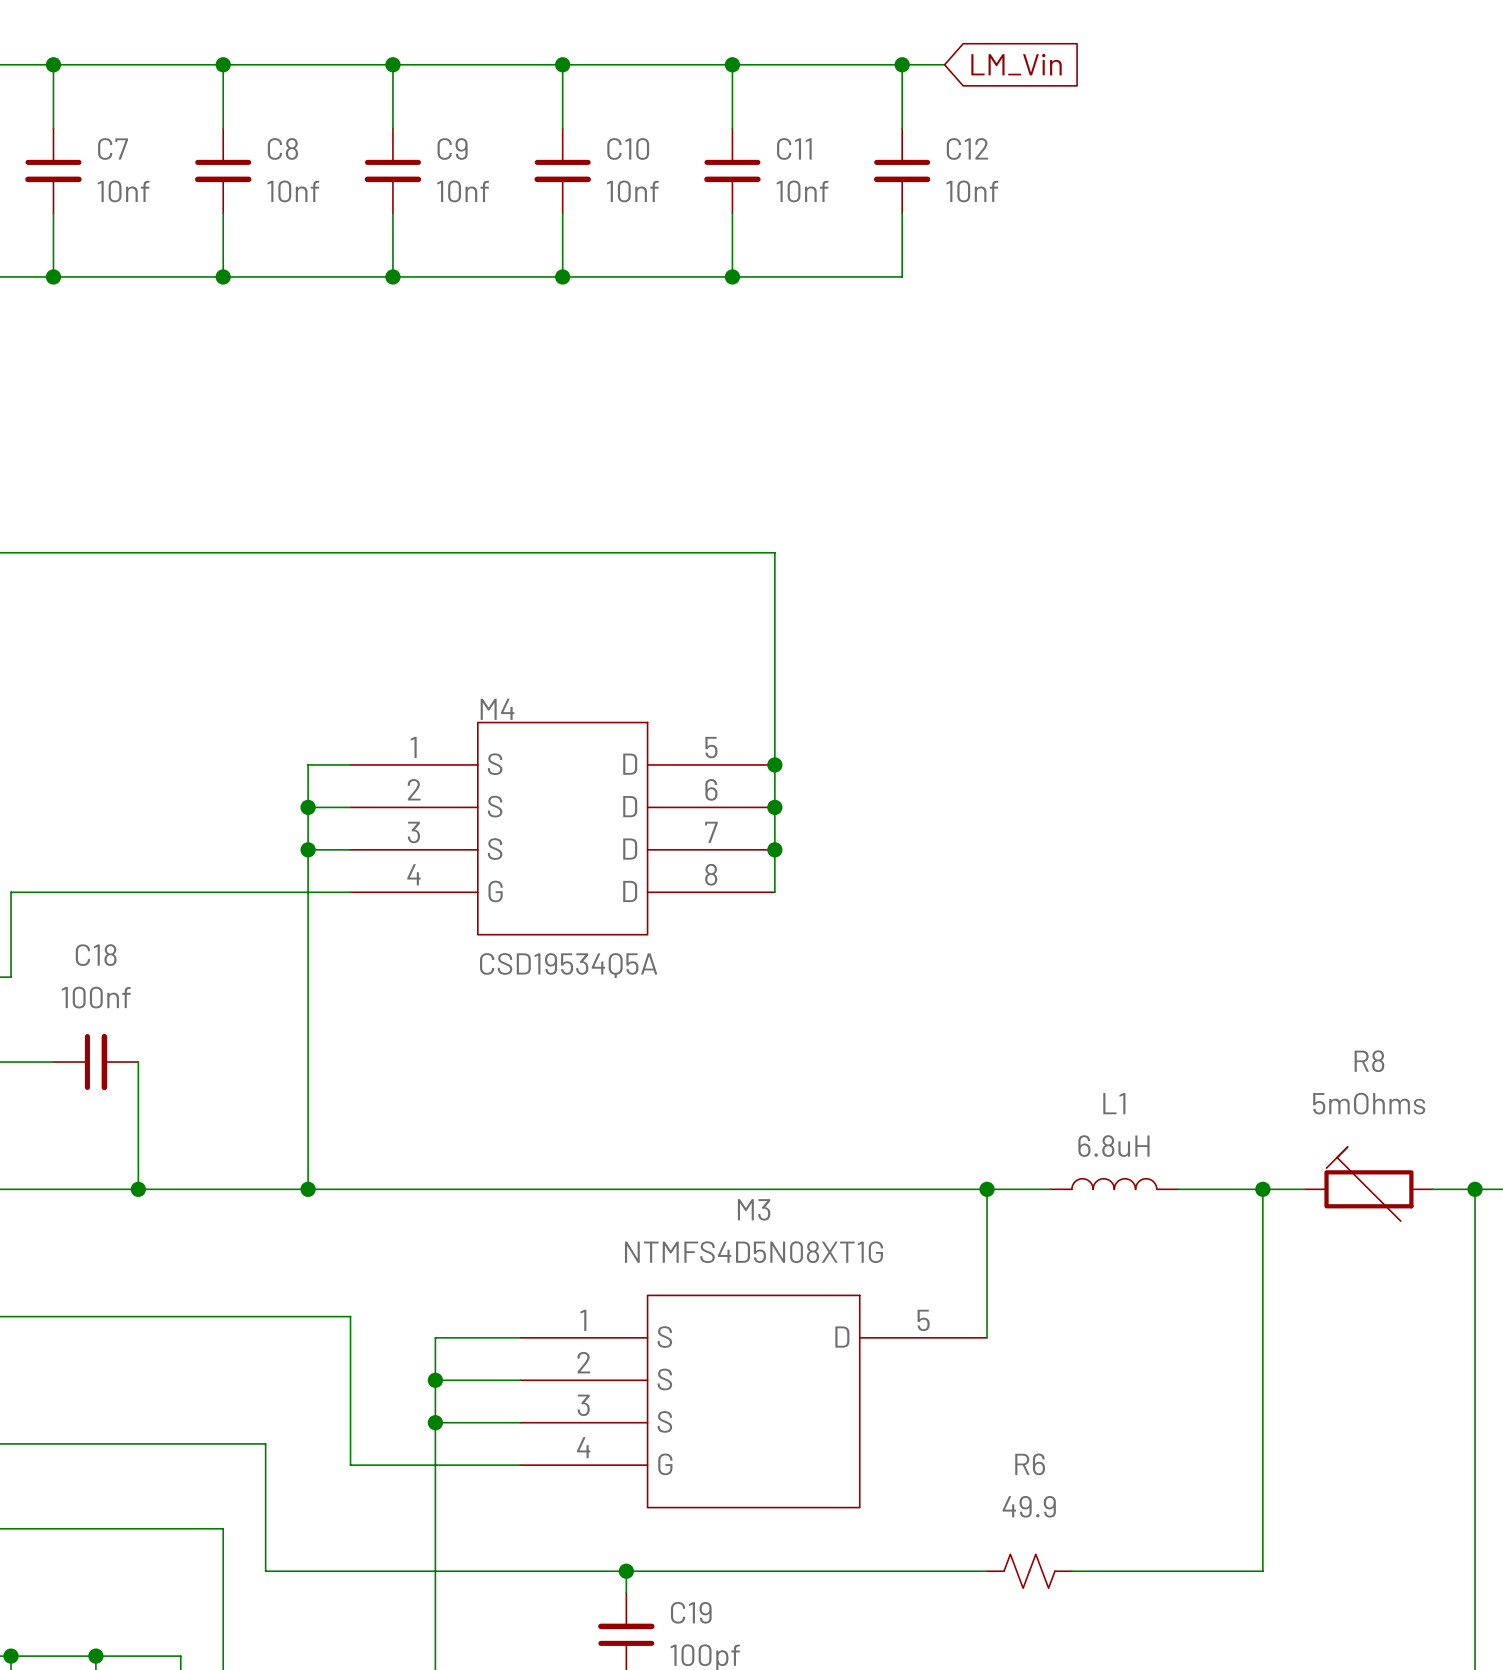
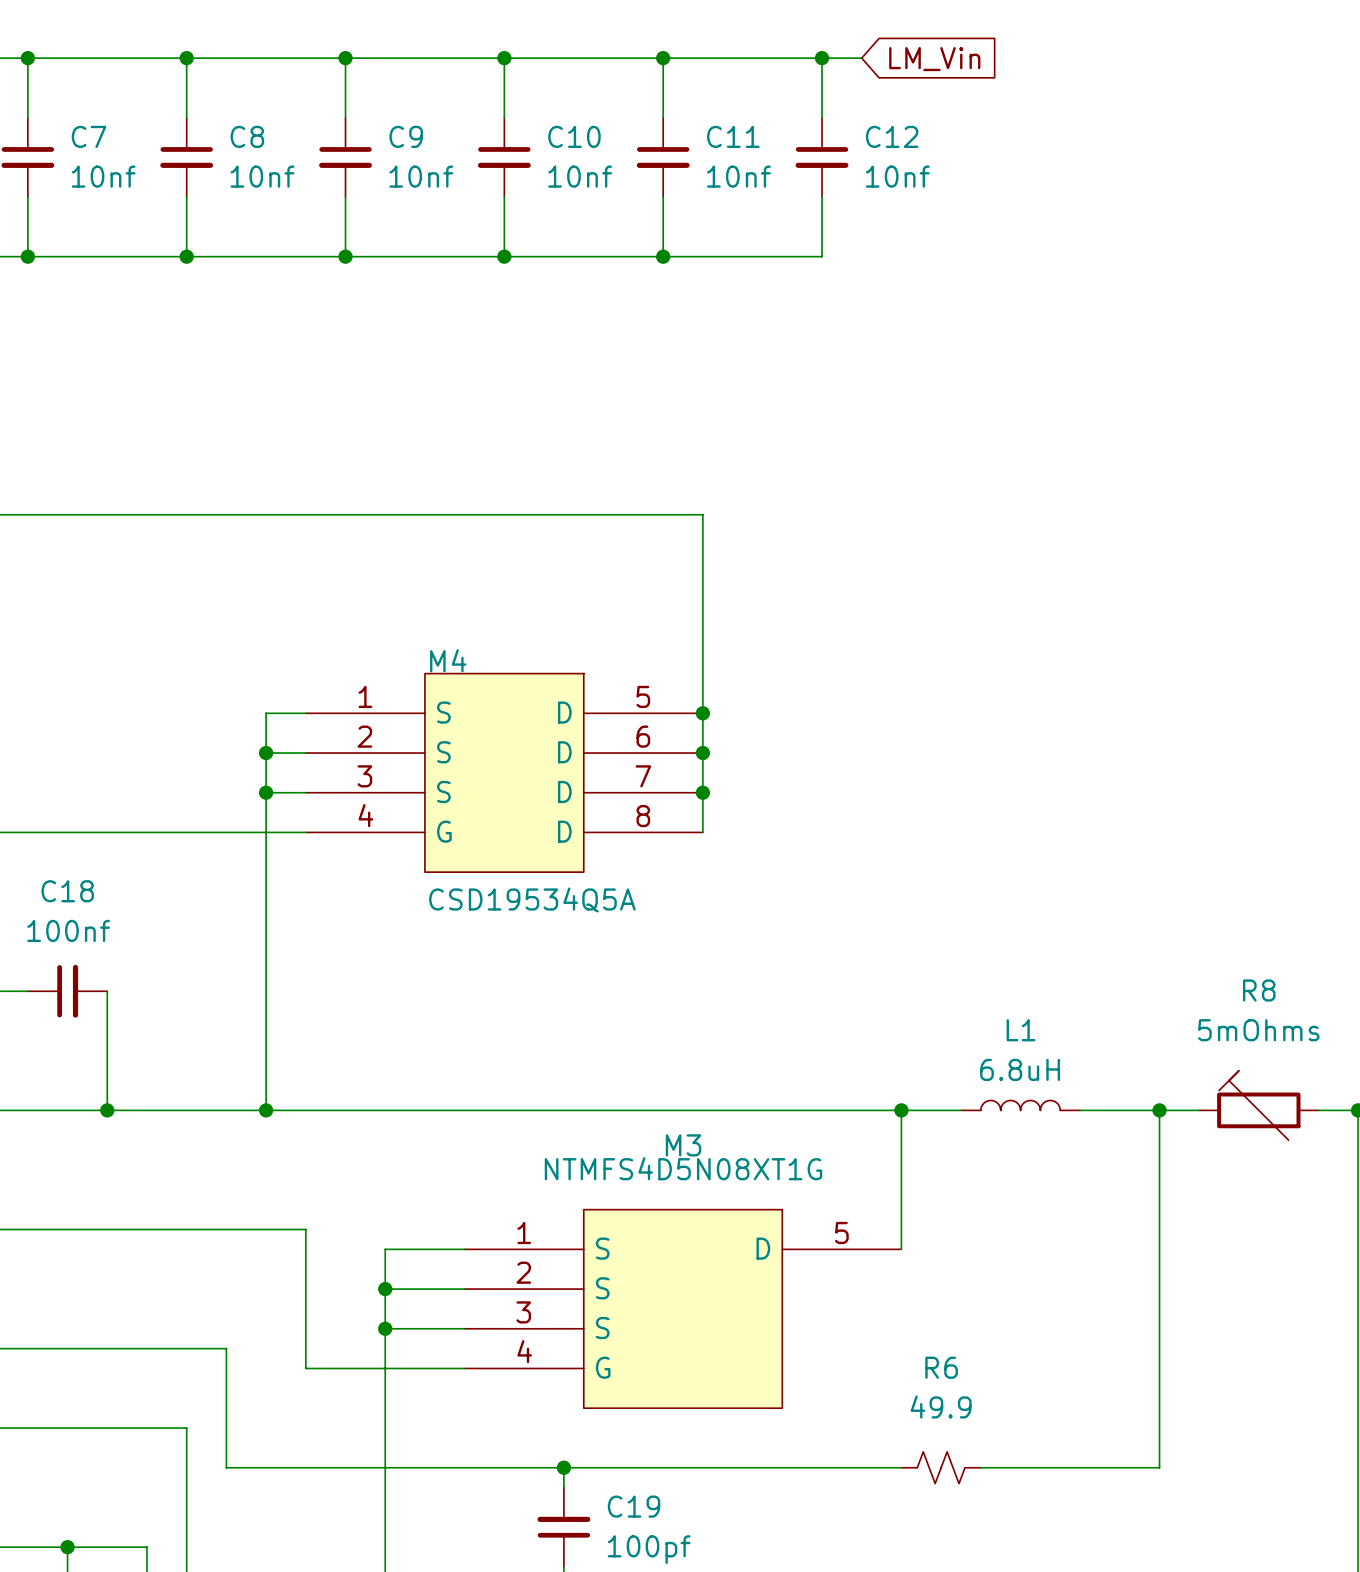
M3 name position: M3 (754, 1209) -> M3 (683, 1145)

